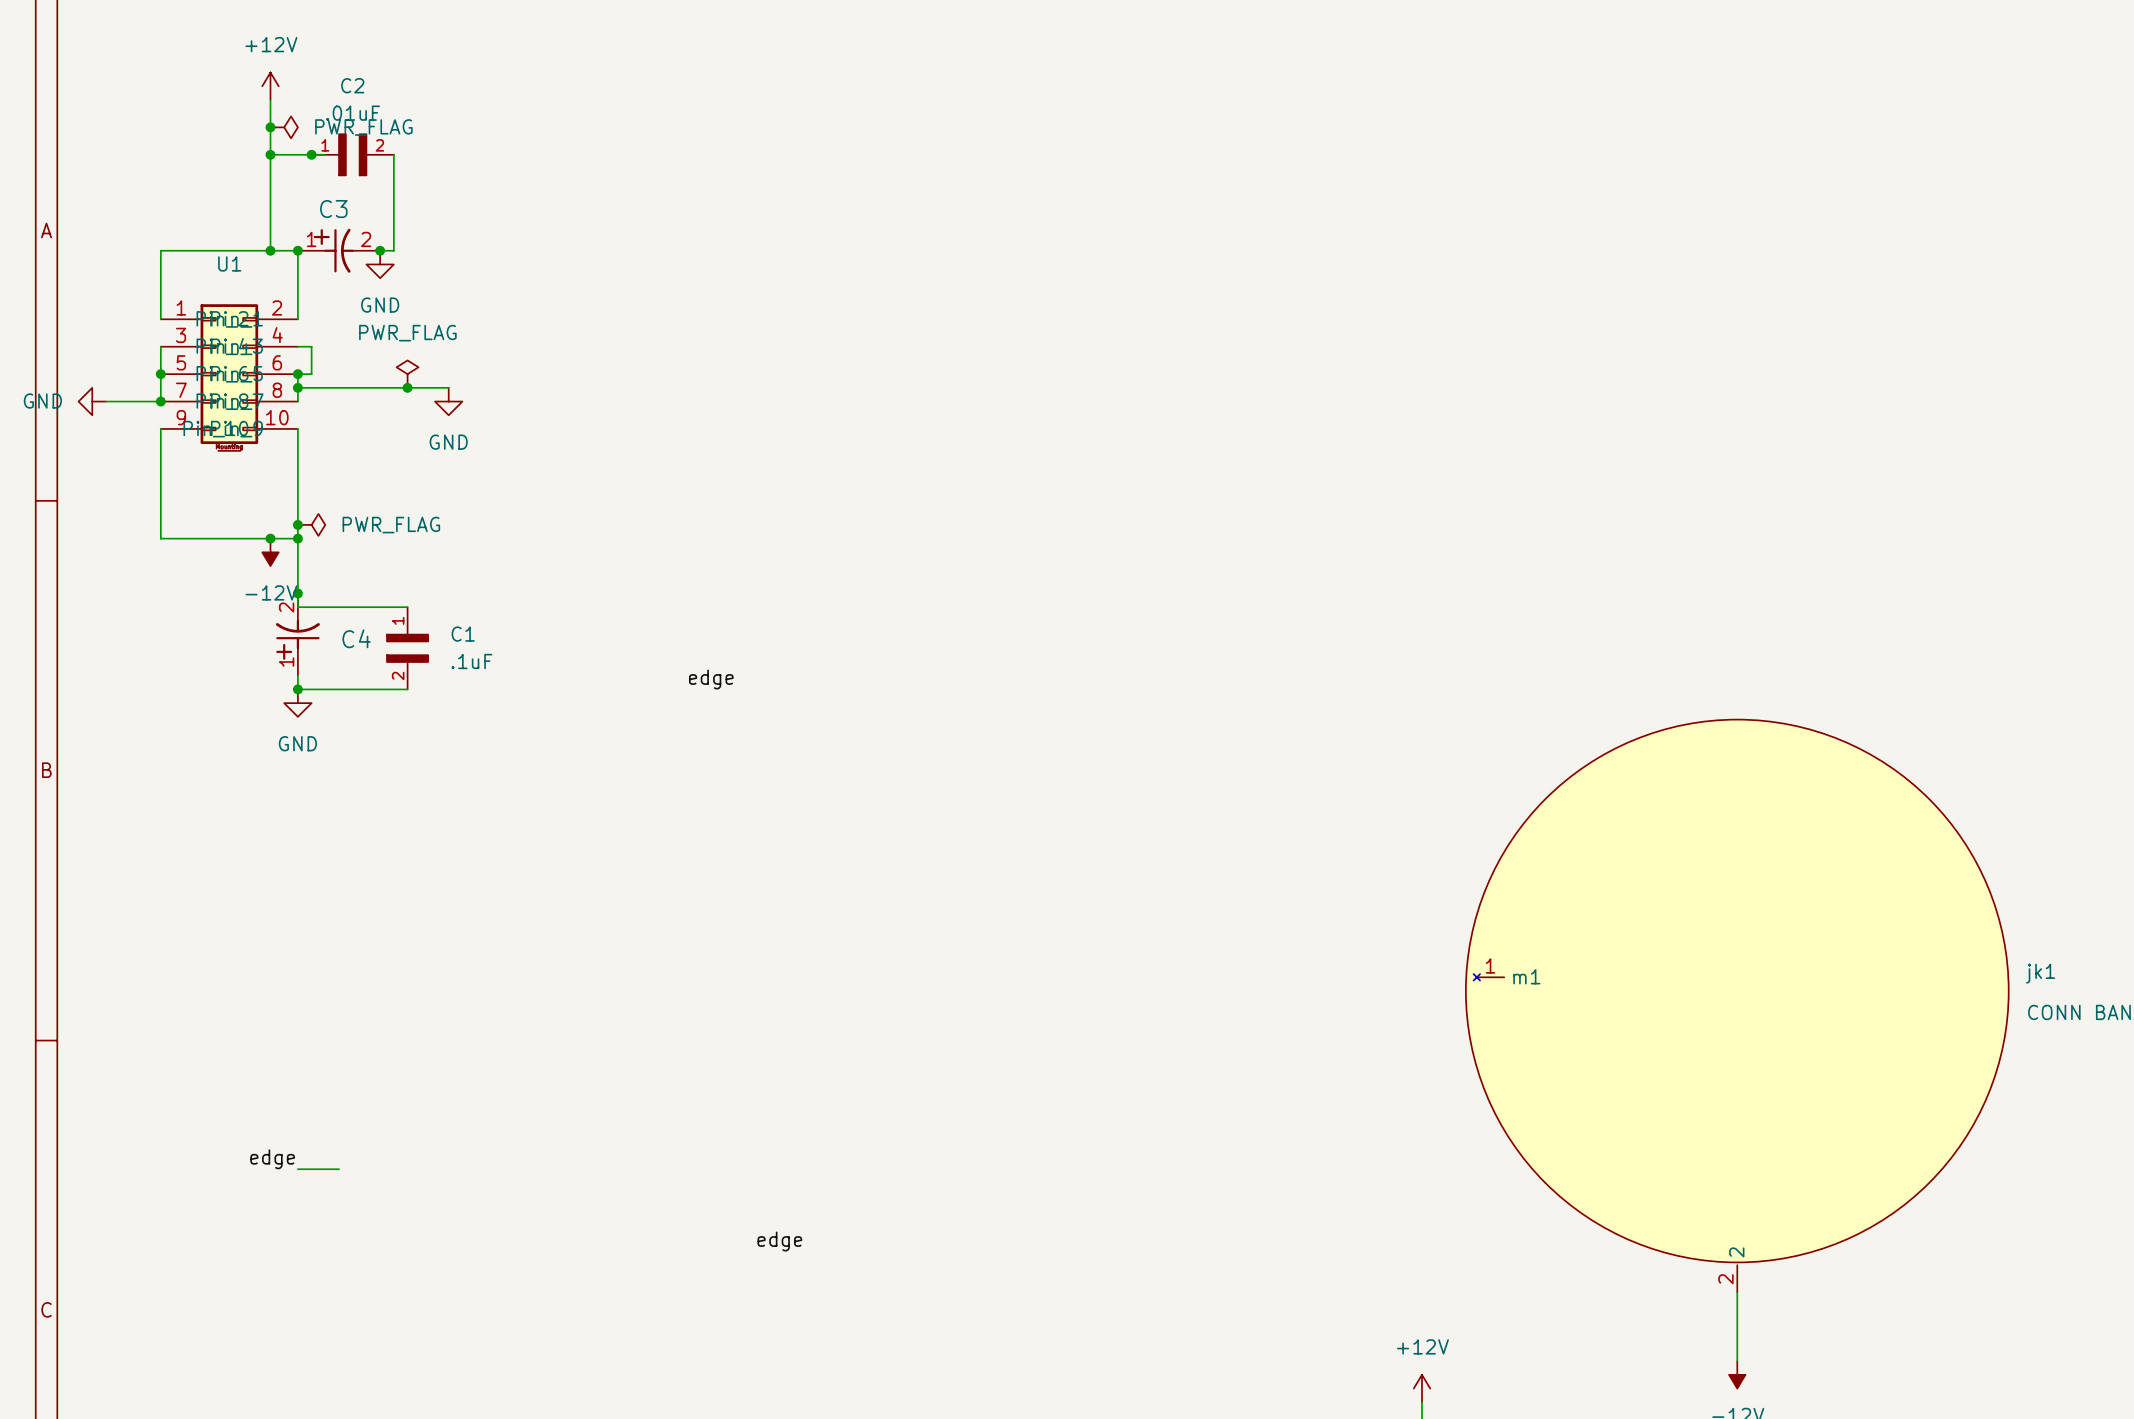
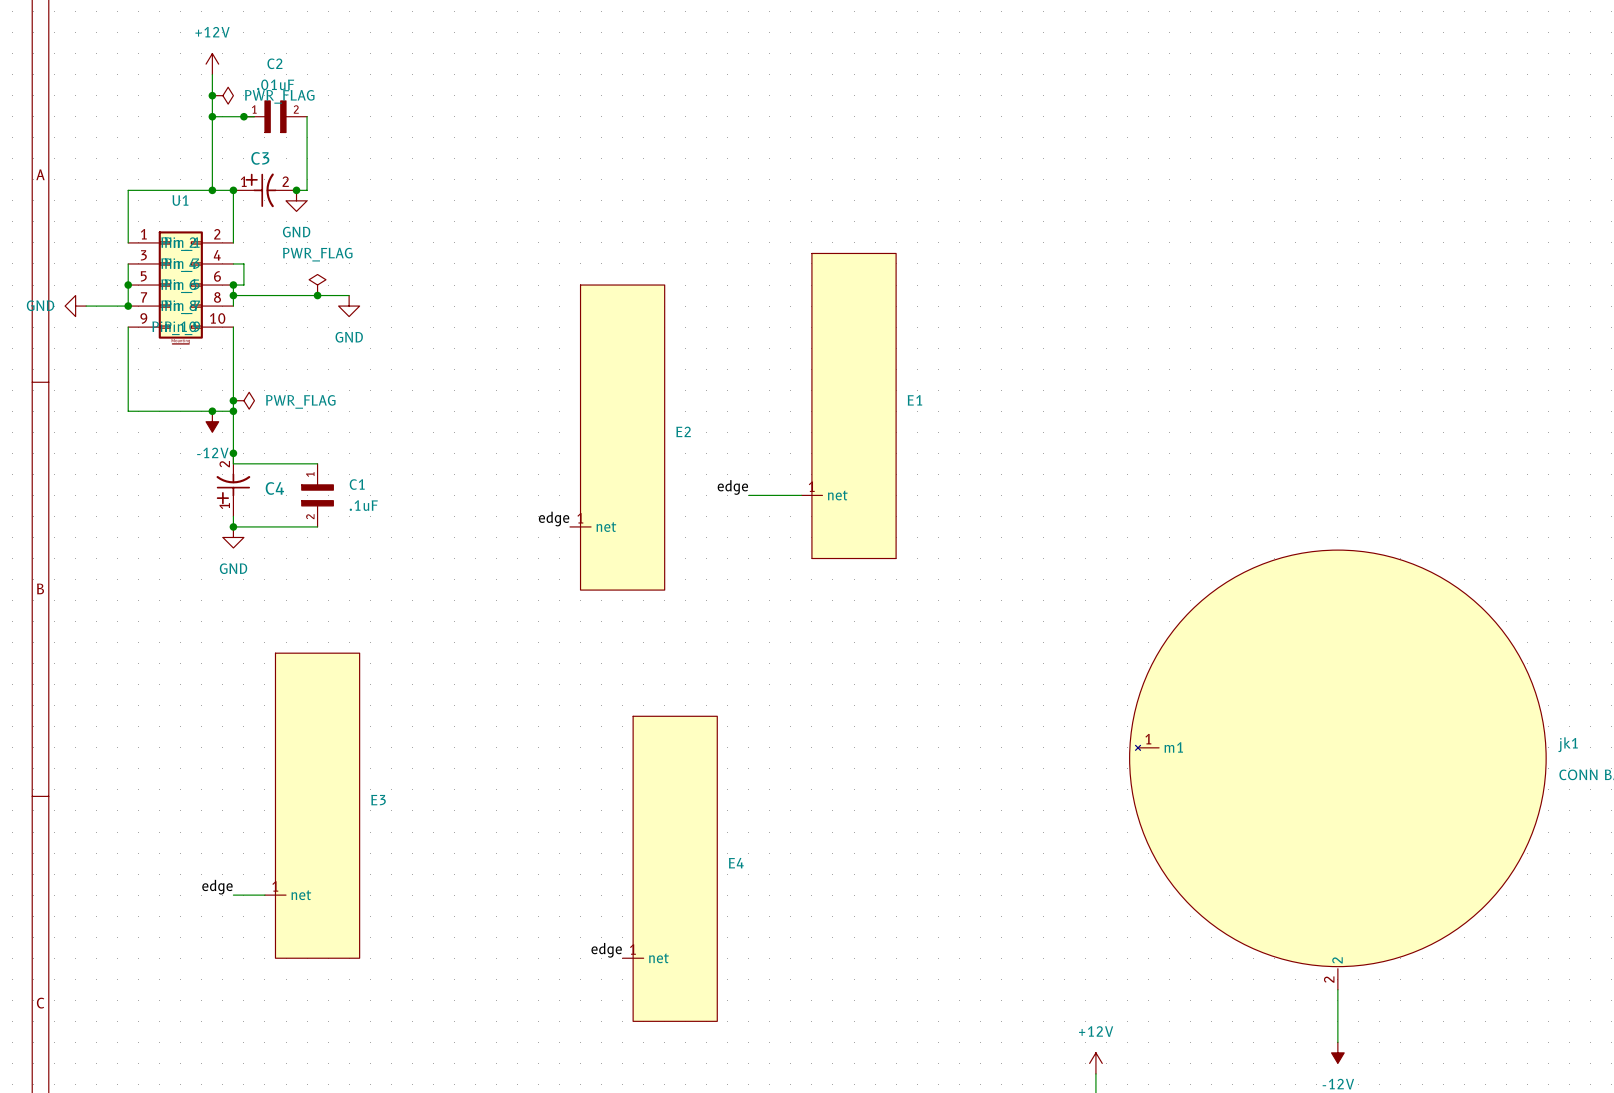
E1: none -> (848, 405)
E2: none -> (617, 437)
label: none -> edge (732, 487)
wire: none -> (748, 495) (801, 495)
E3: none -> (312, 805)
E4: none -> (669, 868)

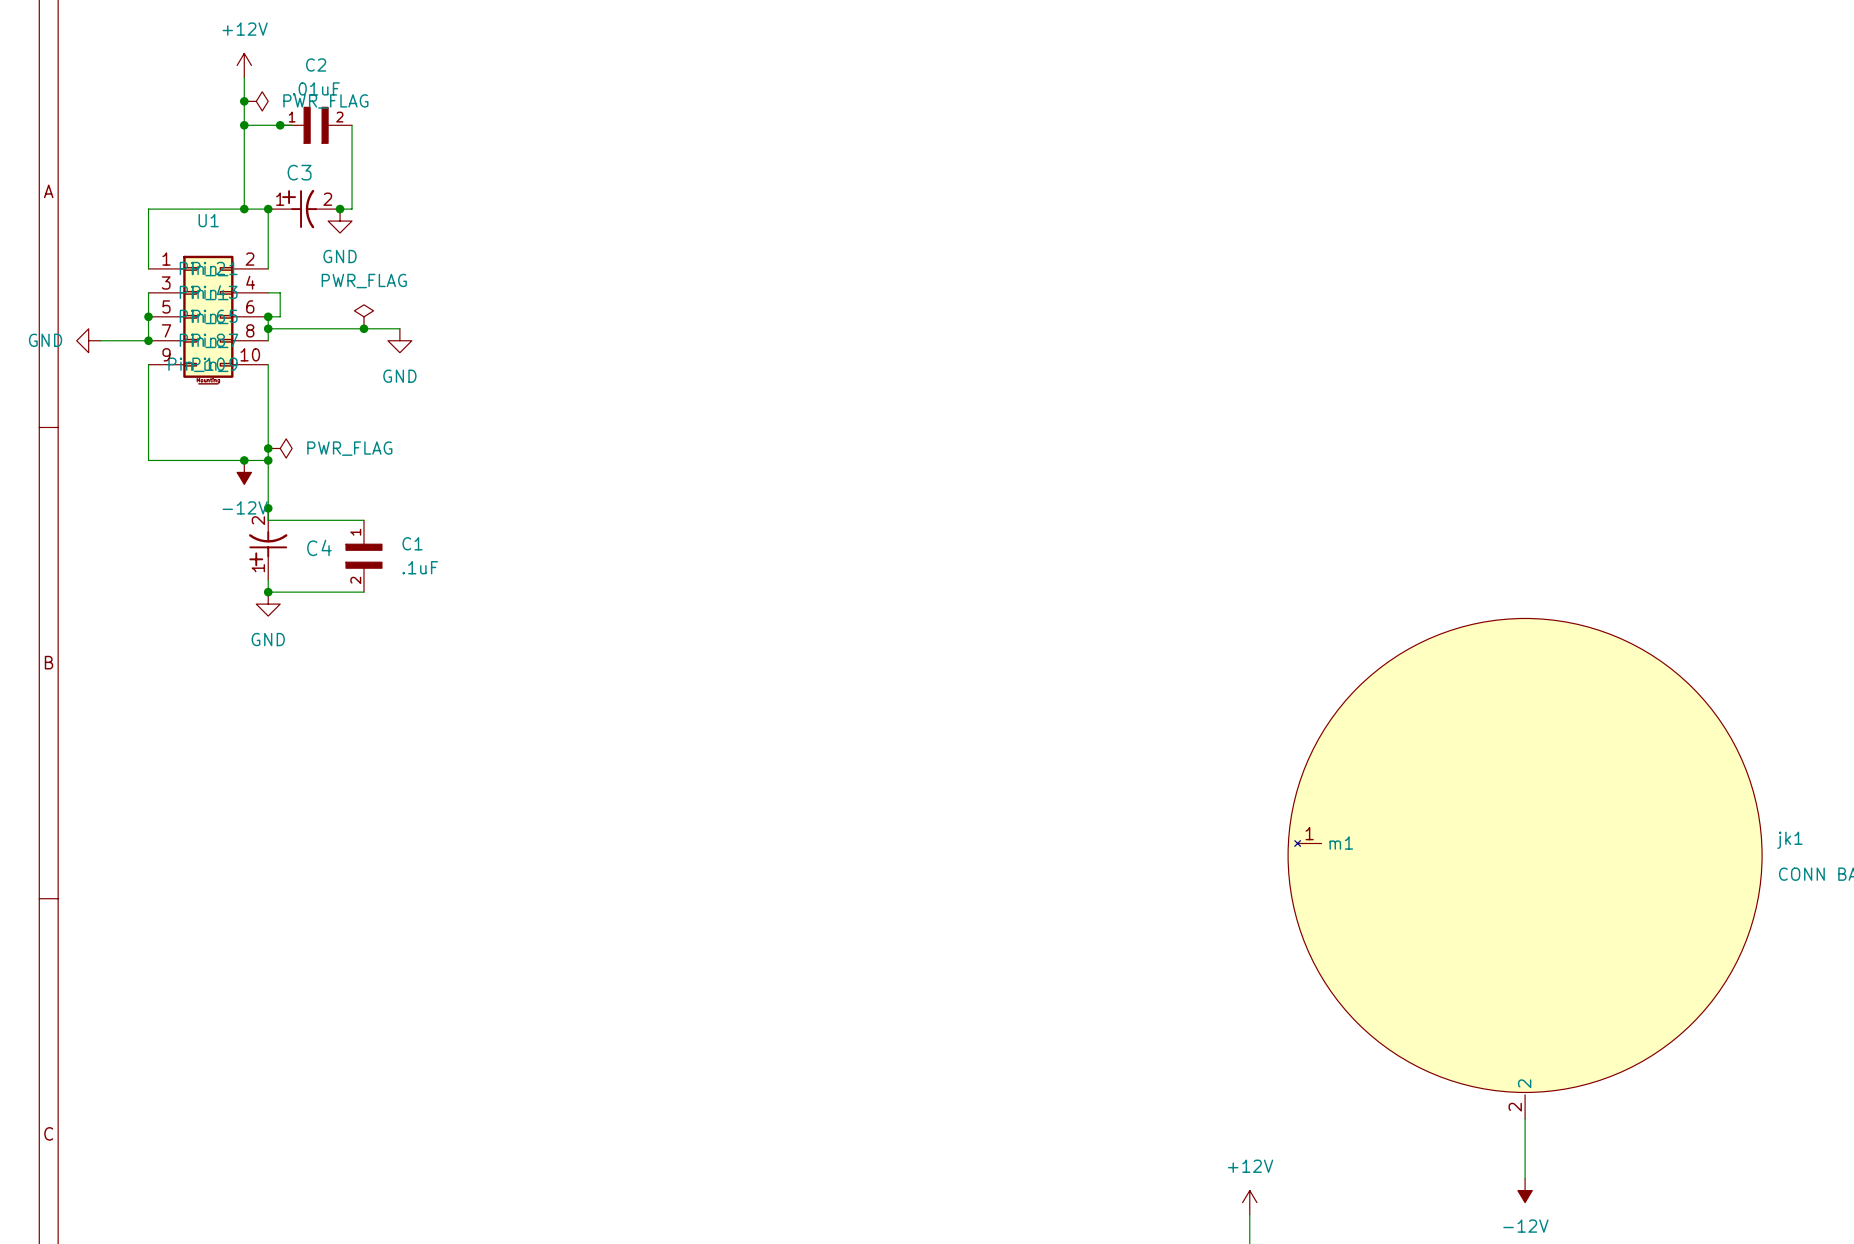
E1: (848, 405) -> none
E2: (617, 437) -> none
label: edge (732, 487) -> none
wire: (748, 495) (801, 495) -> none
label: edge (554, 519) -> none
E3: (312, 805) -> none
E4: (669, 868) -> none
label: edge (217, 887) -> none
wire: (233, 895) (264, 895) -> none
label: edge (606, 950) -> none

